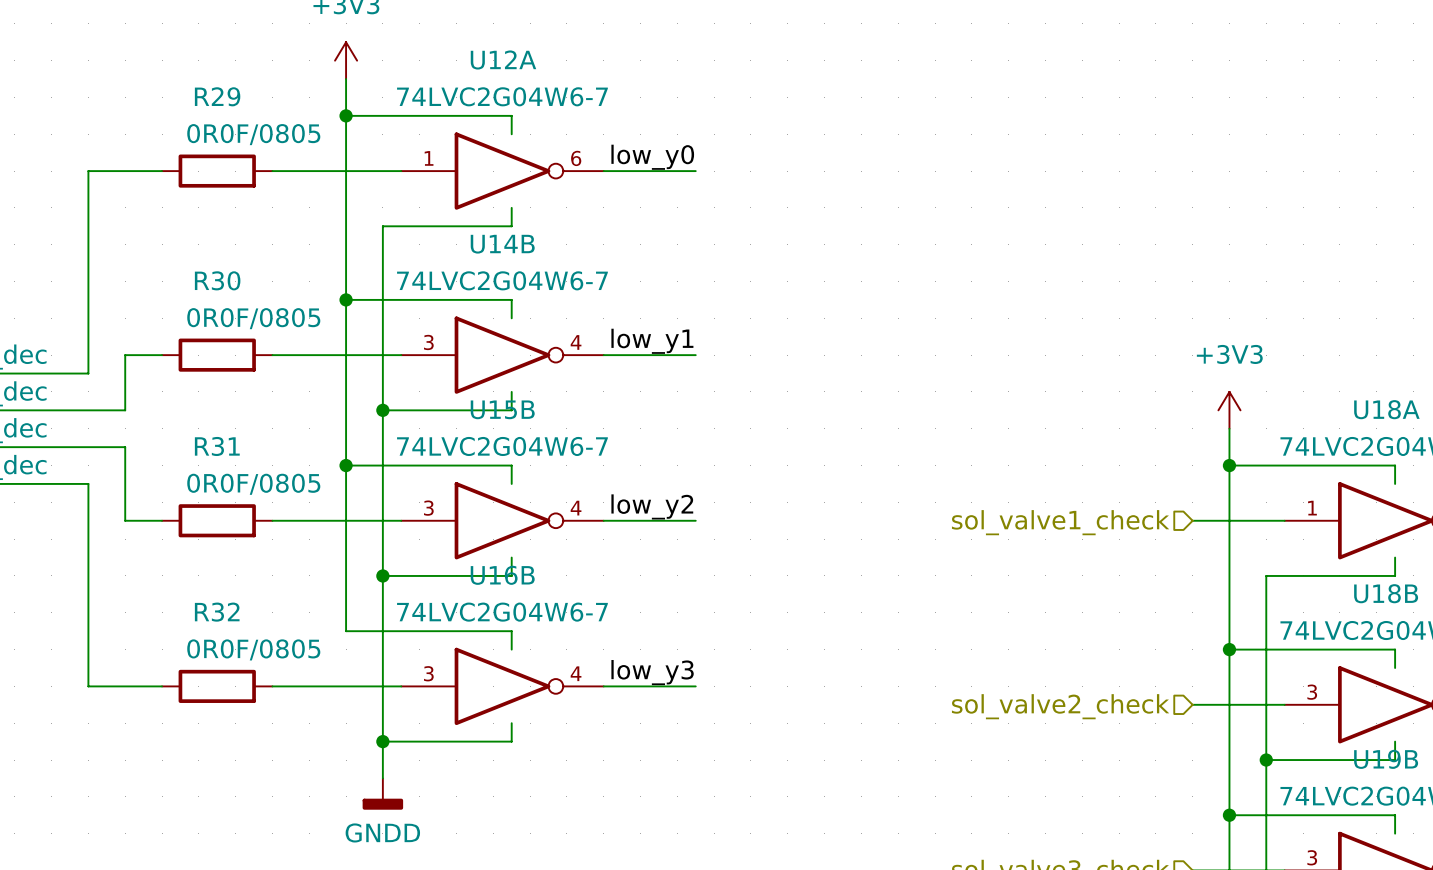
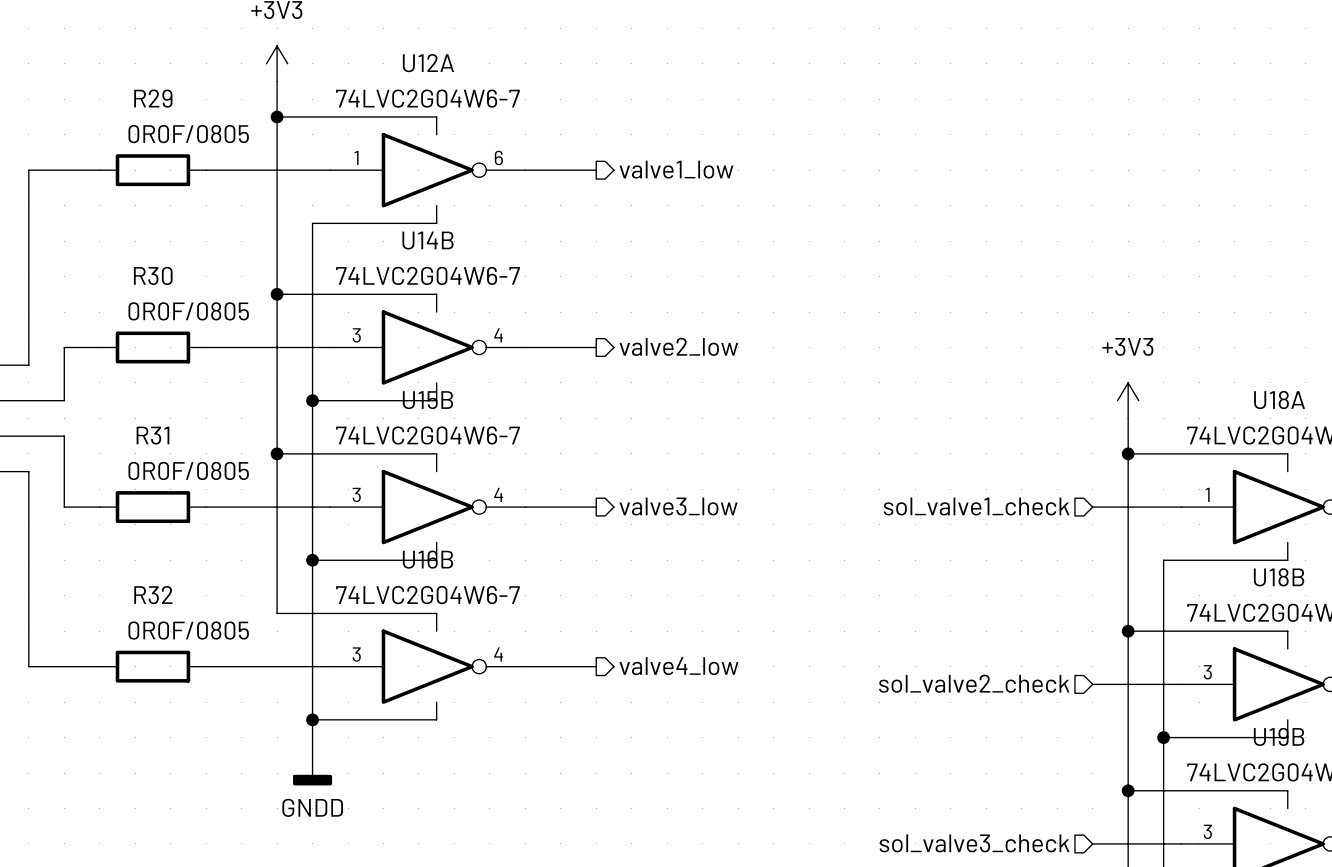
label: low_y0 (652, 157) -> none
wire: (677, 171) (695, 171) -> none
hierarchical label: none -> valve1_low (676, 169)
label: low_y1 (652, 341) -> none
wire: (677, 355) (695, 355) -> none
hierarchical label: none -> valve2_low (678, 346)
label: low_y2 (652, 506) -> none
wire: (677, 520) (695, 520) -> none
hierarchical label: none -> valve3_low (678, 506)
label: low_y3 (652, 672) -> none
wire: (677, 686) (695, 686) -> none
hierarchical label: none -> valve4_low (678, 666)

